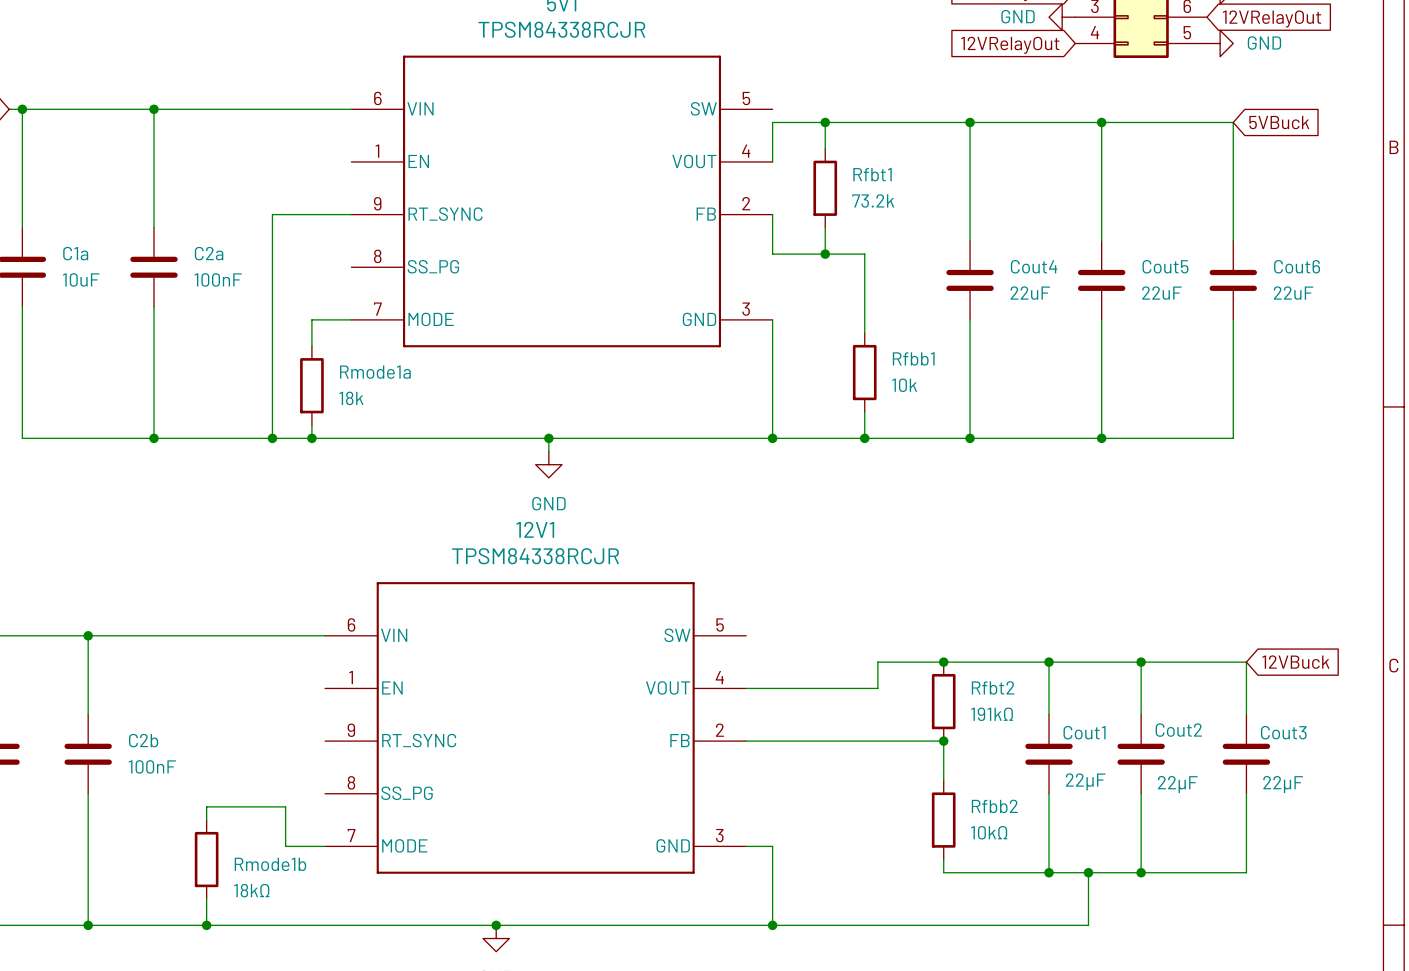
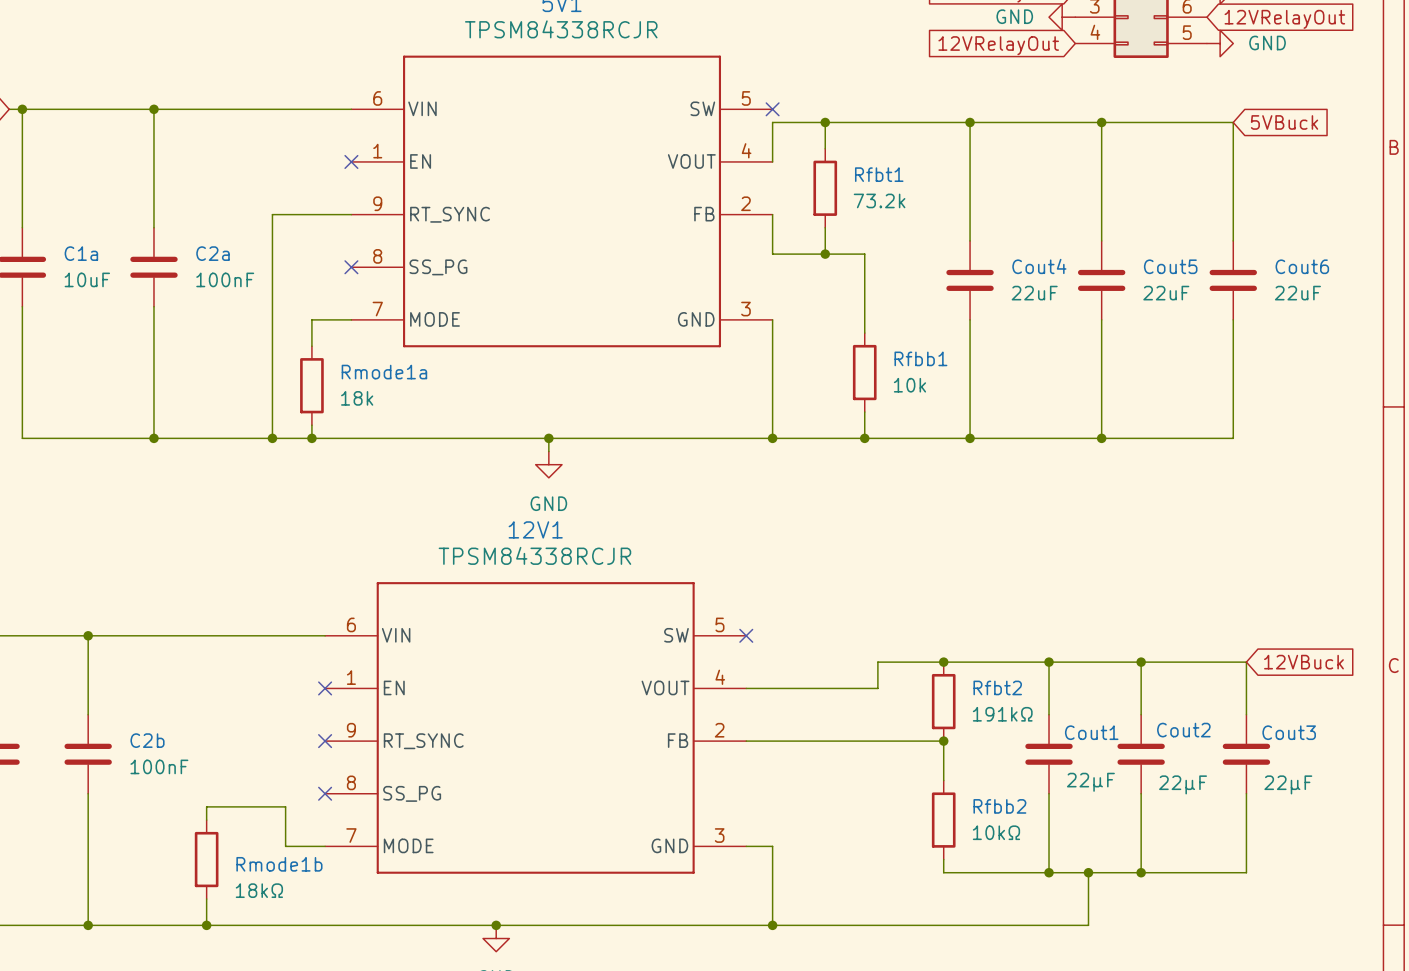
no-connect mark: none -> (772, 109)
no-connect mark: none -> (351, 161)
no-connect mark: none -> (351, 267)
no-connect mark: none -> (746, 635)
no-connect mark: none -> (325, 688)
no-connect mark: none -> (325, 741)
no-connect mark: none -> (325, 793)

